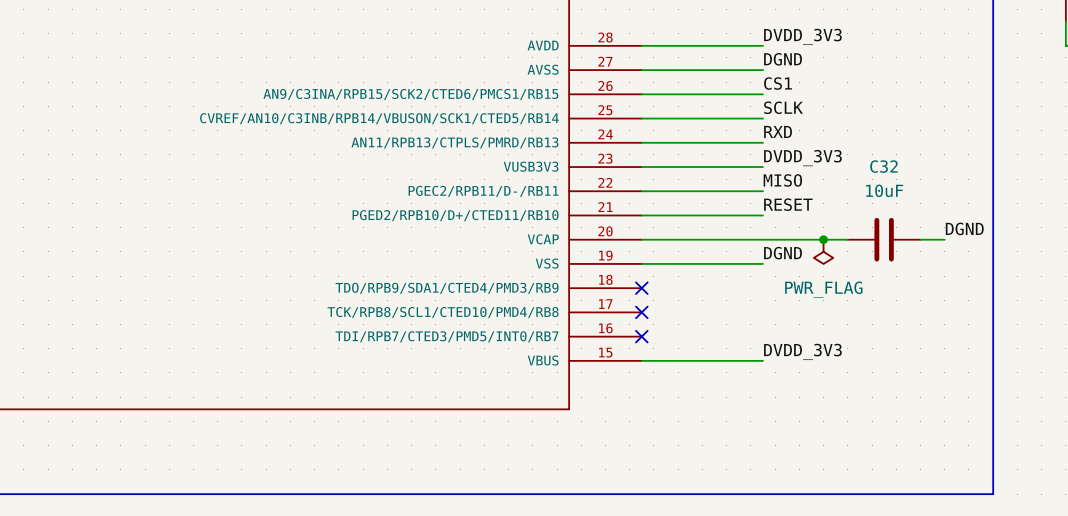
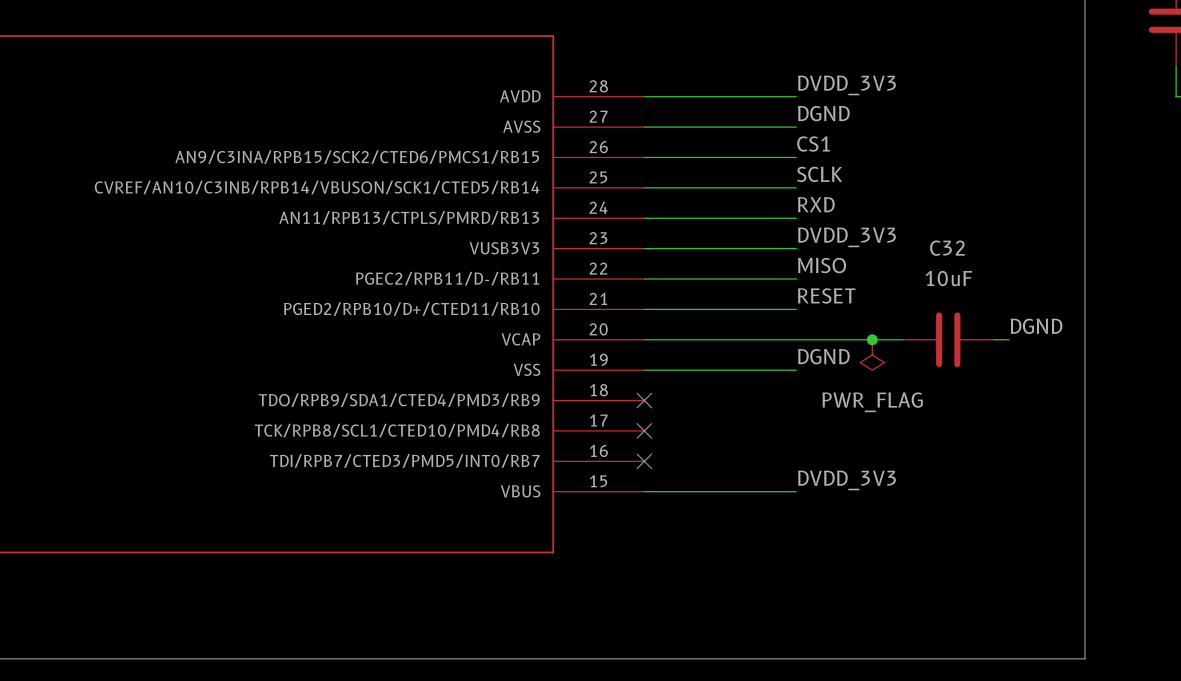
label position: DGND (964, 228) -> DGND (1036, 326)
wire: (932, 239) (944, 239) -> none

